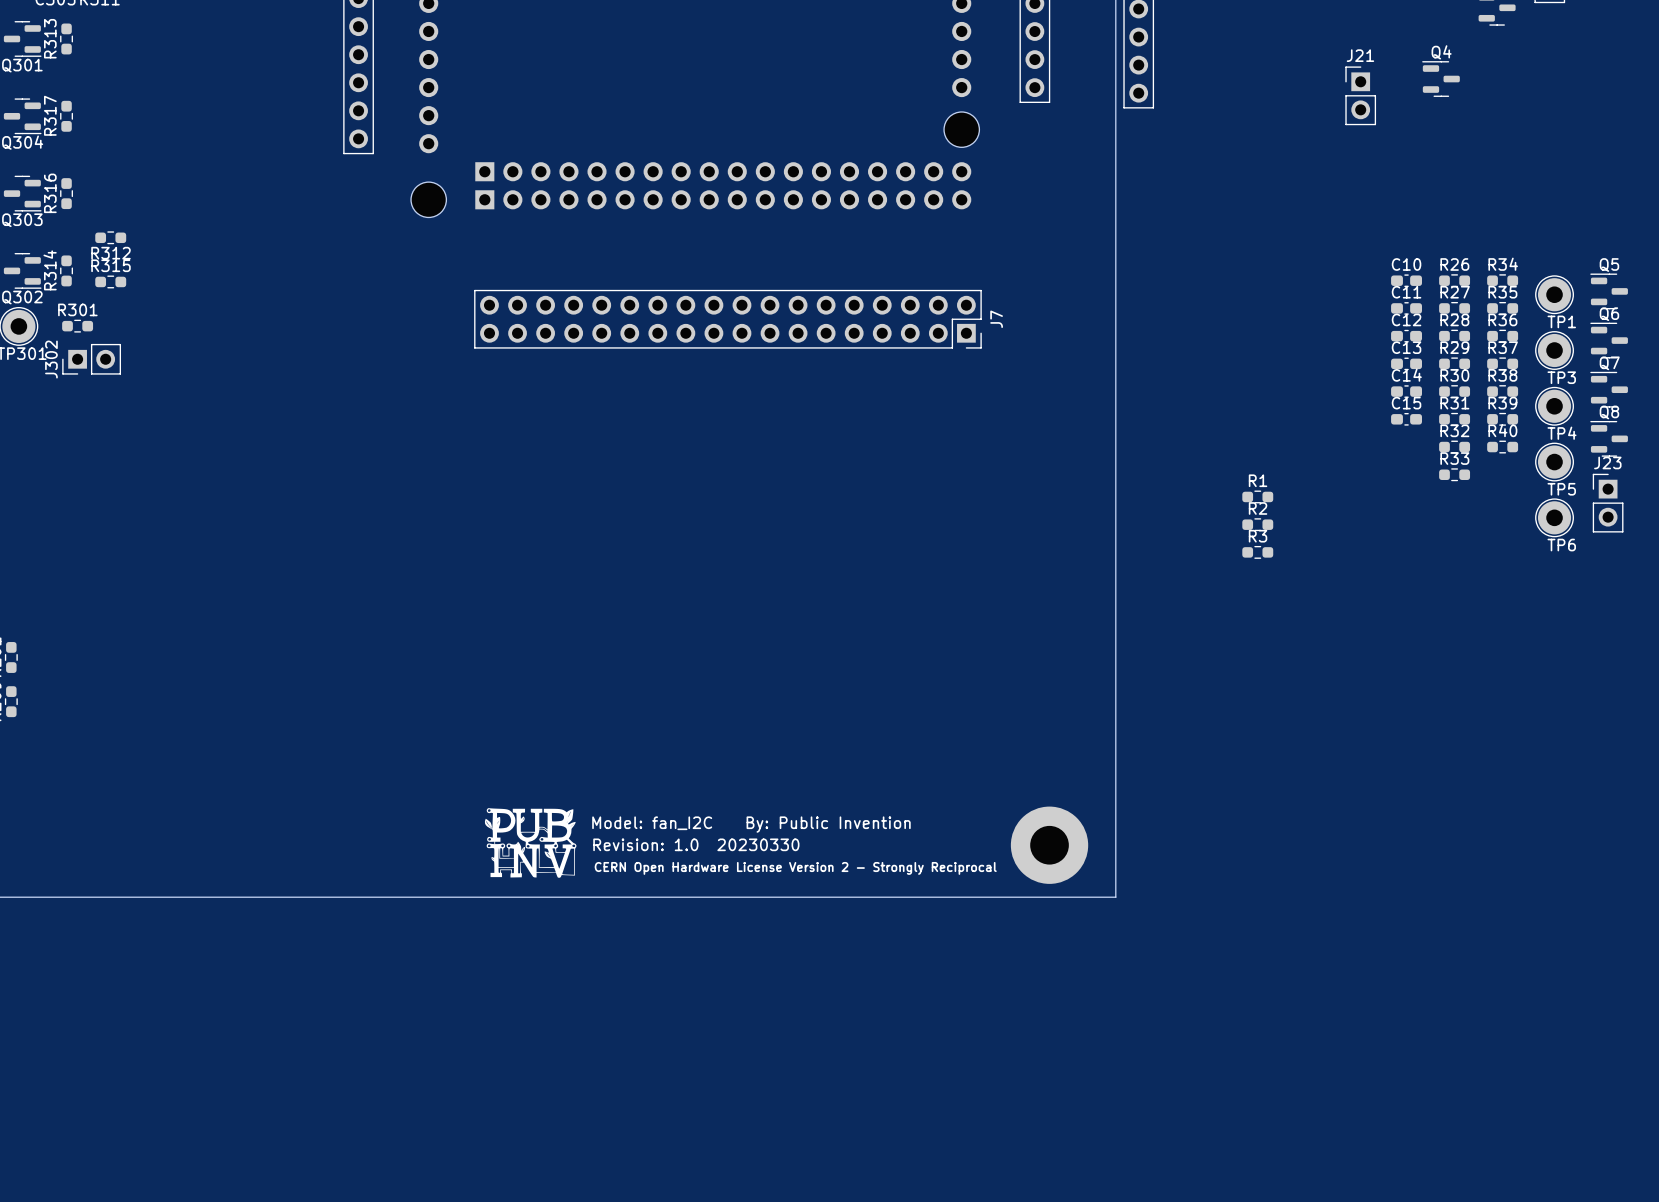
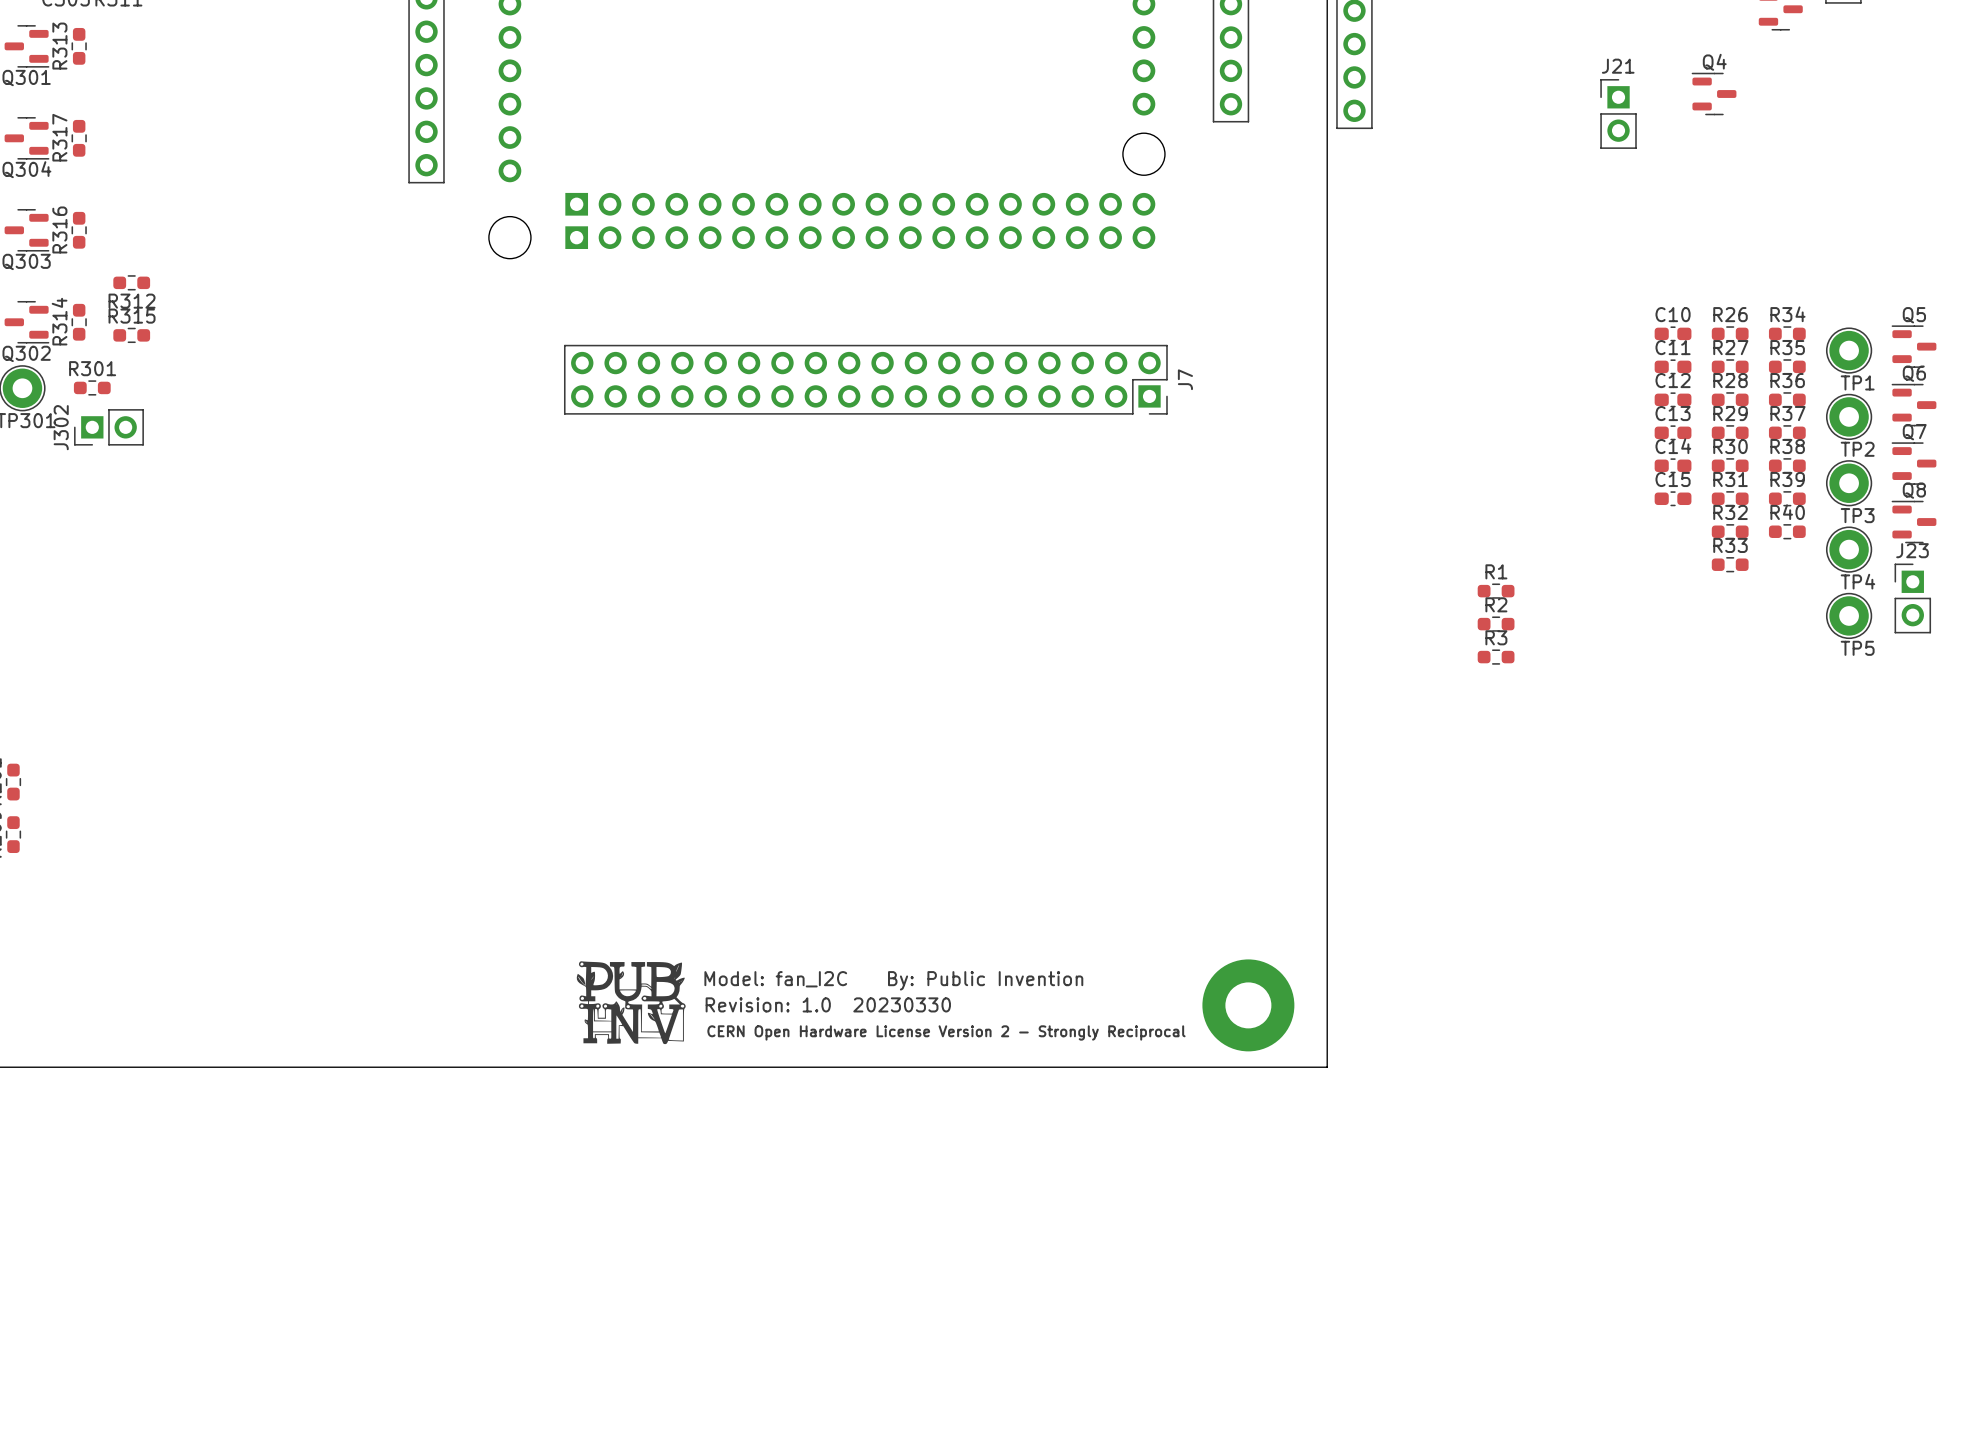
TP3 name: TP3 (1561, 377) -> TP2 (1857, 449)
TP4 name: TP4 (1562, 433) -> TP3 (1857, 515)
TP5 name: TP5 (1561, 489) -> TP4 (1857, 581)
TP6 name: TP6 (1561, 545) -> TP5 (1857, 648)

